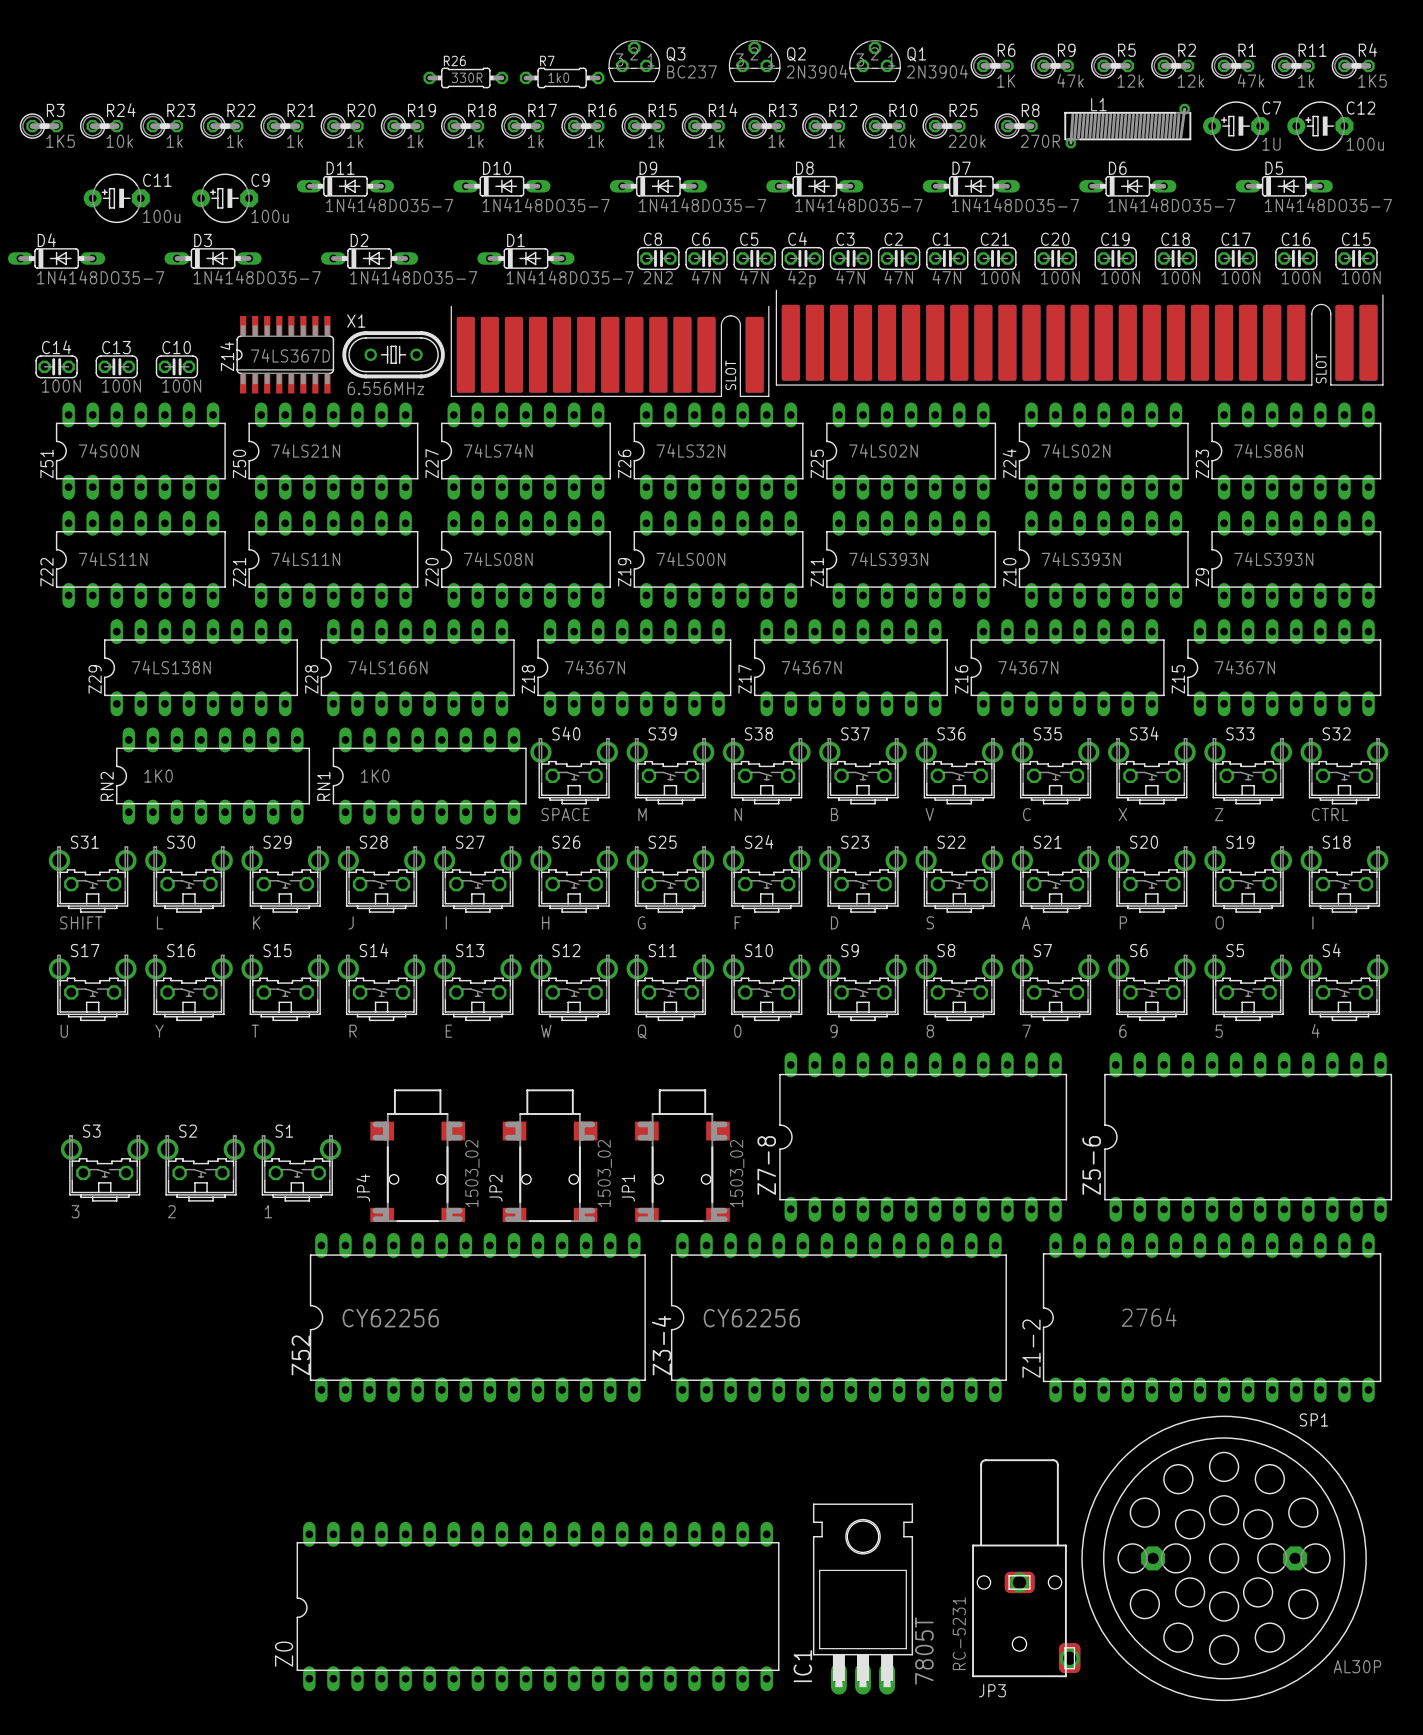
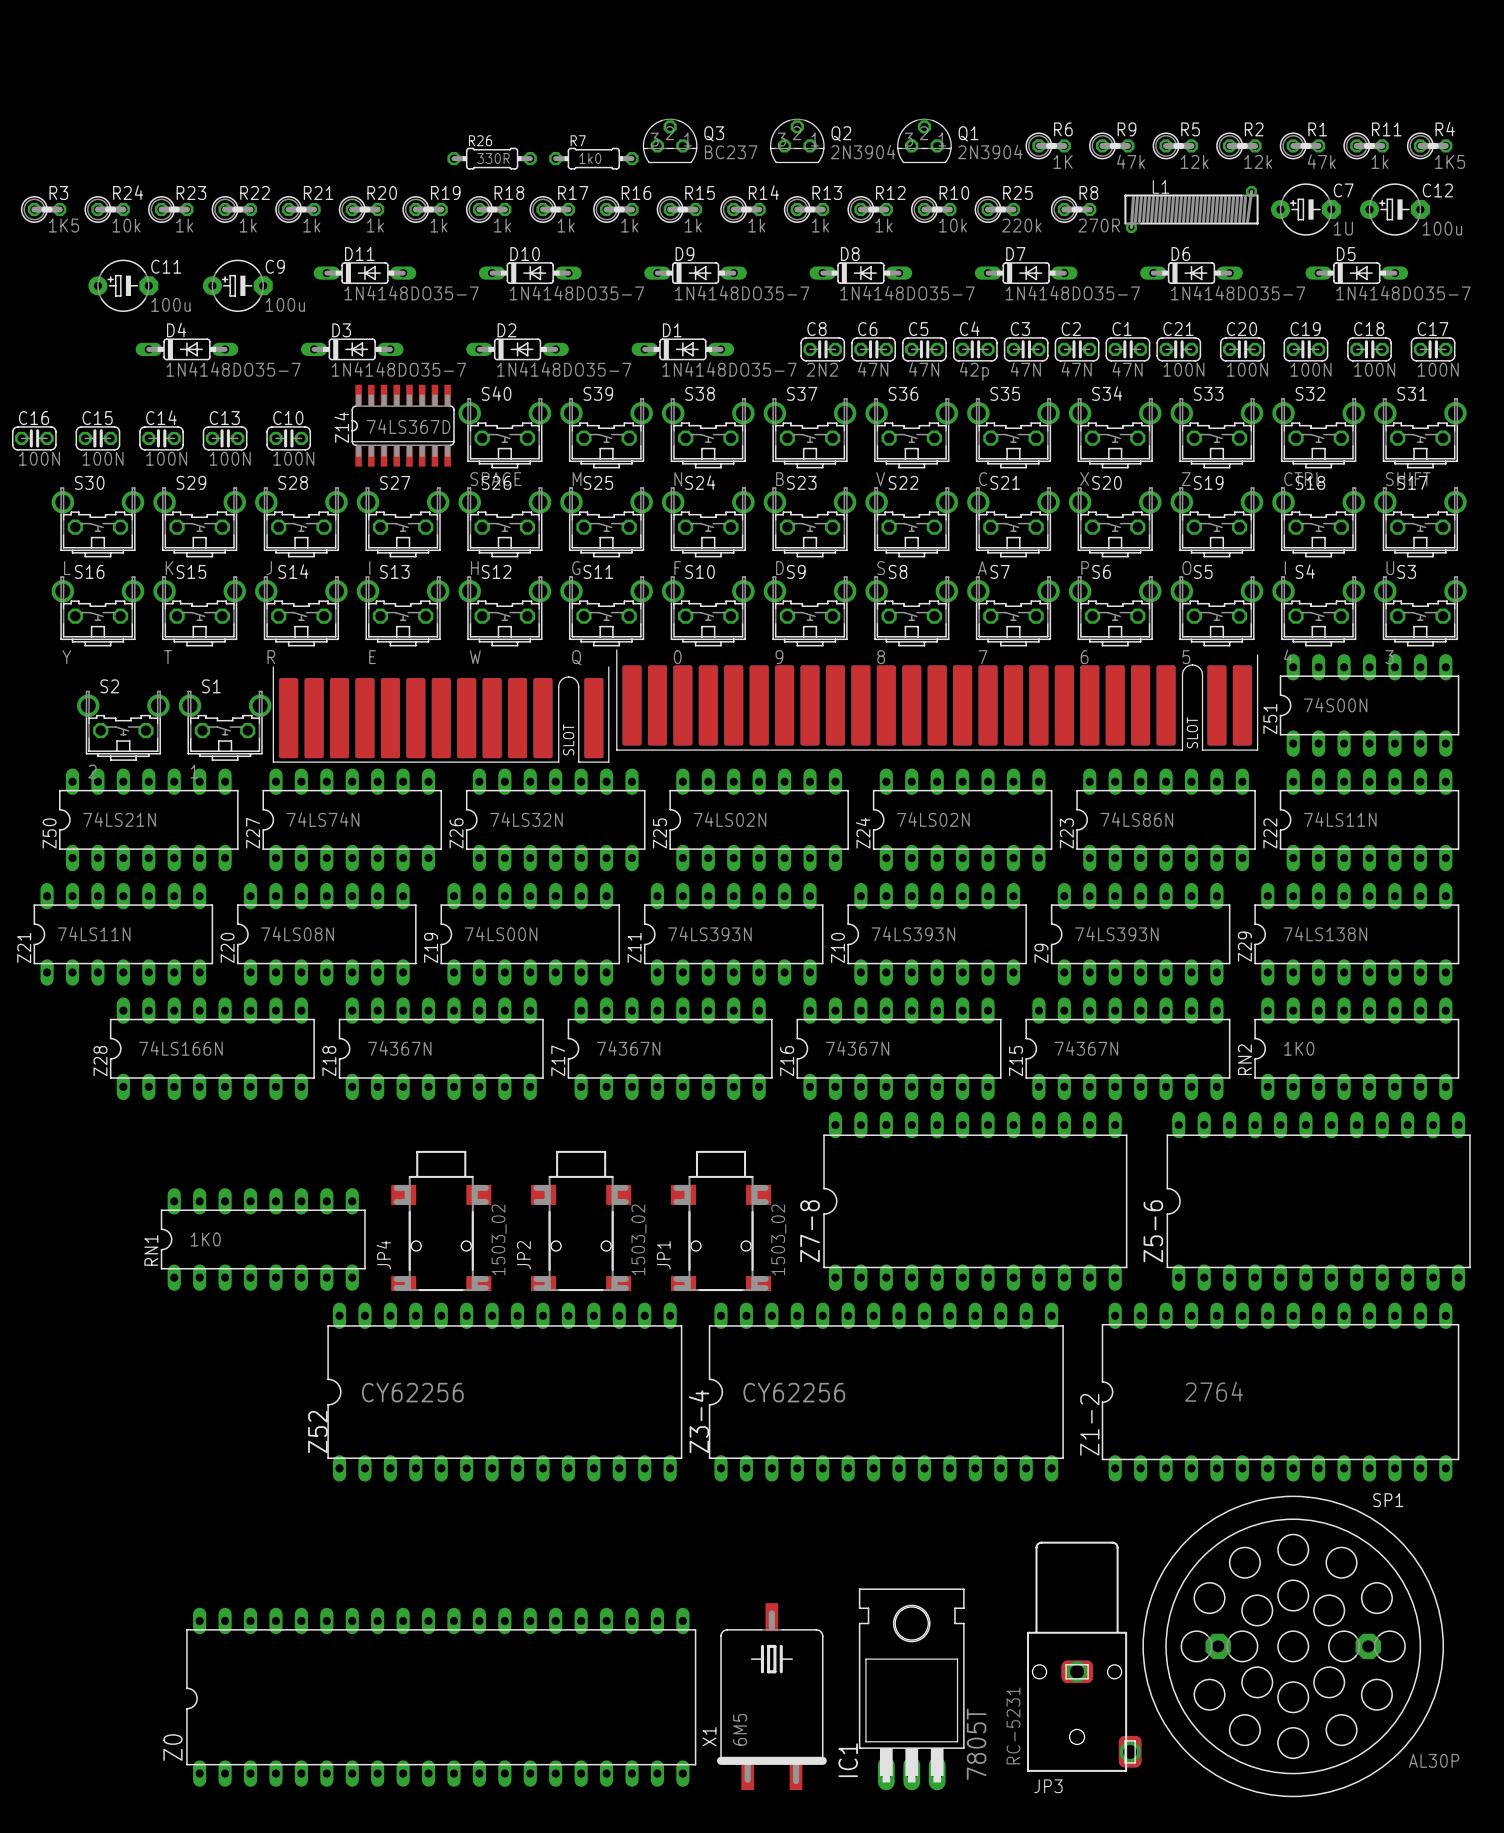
Q3 position: (634, 61) -> (670, 140)
Q2 position: (754, 61) -> (797, 140)
Q1 position: (875, 61) -> (924, 140)
R6 position: (992, 65) -> (1048, 145)
R9 position: (1052, 65) -> (1111, 145)
R5 position: (1112, 65) -> (1175, 145)
R2 position: (1172, 65) -> (1238, 145)
R1 position: (1232, 65) -> (1302, 145)
R11 position: (1293, 65) -> (1366, 145)
R4 position: (1353, 65) -> (1429, 145)
R26 position: (465, 77) -> (492, 158)
R7 position: (562, 77) -> (593, 158)
R3 position: (41, 126) -> (43, 209)
R24 position: (101, 126) -> (107, 209)
R23 position: (161, 126) -> (170, 209)
R22 position: (221, 126) -> (234, 209)
R21 position: (282, 126) -> (297, 209)
R20 position: (342, 126) -> (361, 209)
R19 position: (402, 126) -> (425, 209)
R18 position: (462, 126) -> (488, 209)
R17 position: (522, 126) -> (552, 209)
R16 position: (582, 126) -> (615, 209)
R15 position: (643, 126) -> (679, 209)
R14 position: (703, 126) -> (743, 209)
R13 position: (763, 126) -> (806, 209)
R12 position: (823, 126) -> (870, 209)
R10 position: (883, 126) -> (933, 209)
R25 position: (944, 126) -> (997, 209)
R8 position: (1016, 126) -> (1073, 209)
L1 position: (1127, 126) -> (1191, 209)
C7 position: (1236, 126) -> (1305, 209)
C12 position: (1320, 126) -> (1394, 209)
D11 position: (345, 186) -> (364, 273)
D10 position: (501, 186) -> (530, 273)
D9 position: (658, 186) -> (695, 273)
D8 position: (814, 186) -> (860, 273)
D7 position: (971, 186) -> (1026, 273)
D6 position: (1127, 186) -> (1191, 273)
D5 position: (1284, 186) -> (1356, 273)
C11 position: (116, 198) -> (123, 285)
C9 position: (225, 198) -> (237, 285)
D4 position: (56, 258) -> (186, 349)
D3 position: (213, 258) -> (352, 349)
D2 position: (369, 258) -> (517, 349)
D1 position: (525, 258) -> (682, 349)
C8 position: (658, 258) -> (822, 349)
C6 position: (706, 258) -> (873, 349)
C5 position: (754, 258) -> (924, 349)
C4 position: (802, 258) -> (975, 349)
C3 position: (850, 258) -> (1026, 349)
C2 position: (899, 258) -> (1077, 349)
C1 position: (947, 258) -> (1127, 349)
C21 position: (995, 258) -> (1178, 349)
C20 position: (1055, 258) -> (1242, 349)
C19 position: (1115, 258) -> (1305, 349)
C18 position: (1175, 258) -> (1369, 349)
C17 position: (1236, 258) -> (1433, 349)
C16 position: (1296, 258) -> (34, 438)
C15 position: (1356, 258) -> (97, 438)
X1 name position: X1 (356, 321) -> X1 (709, 1736)
X1 footprint: [342, 331, 445, 379] -> [716, 1603, 827, 1791]
part: (1079, 337) -> none
part: (610, 351) -> none
Z14 position: (285, 354) -> (403, 425)
C14 position: (56, 366) -> (161, 438)
C13 position: (116, 366) -> (225, 438)
C10 position: (176, 366) -> (288, 438)
X1 value: 6.556MHz (385, 388) -> 6M5 (740, 1729)
Z51 position: (140, 451) -> (1369, 705)
Z50 position: (333, 451) -> (148, 819)
Z27 position: (525, 451) -> (352, 819)
Z26 position: (718, 451) -> (555, 819)
Z25 position: (911, 451) -> (759, 819)
Z24 position: (1103, 451) -> (962, 819)
Z23 position: (1296, 451) -> (1166, 819)
Z22 position: (140, 559) -> (1369, 819)
Z21 position: (333, 559) -> (123, 934)
Z20 position: (525, 559) -> (326, 934)
Z19 position: (718, 559) -> (530, 934)
Z11 position: (911, 559) -> (733, 934)
Z10 position: (1103, 559) -> (937, 934)
Z9 position: (1296, 559) -> (1140, 934)
part: none -> (937, 700)
Z29 position: (201, 667) -> (1356, 934)
Z28 position: (417, 667) -> (212, 1048)
Z18 position: (634, 667) -> (441, 1048)
Z17 position: (850, 667) -> (670, 1048)
Z16 position: (1067, 667) -> (899, 1048)
Z15 position: (1284, 667) -> (1127, 1048)
part: none -> (441, 714)
S40 position: (574, 771) -> (504, 433)
S39 position: (670, 771) -> (606, 433)
S38 position: (766, 771) -> (708, 433)
S37 position: (863, 771) -> (810, 433)
S36 position: (959, 771) -> (911, 433)
S35 position: (1055, 771) -> (1013, 433)
S34 position: (1151, 771) -> (1115, 433)
S33 position: (1248, 771) -> (1216, 433)
S32 position: (1344, 771) -> (1318, 433)
RN2 position: (213, 776) -> (1356, 1048)
RN1 position: (429, 776) -> (263, 1239)
S31 position: (92, 879) -> (1420, 433)
S30 position: (188, 879) -> (97, 522)
S29 position: (285, 879) -> (199, 522)
S28 position: (381, 879) -> (301, 522)
S27 position: (477, 879) -> (403, 522)
S26 position: (574, 879) -> (504, 522)
S25 position: (670, 879) -> (606, 522)
S24 position: (766, 879) -> (708, 522)
S23 position: (863, 879) -> (810, 522)
S22 position: (959, 879) -> (911, 522)
S21 position: (1055, 879) -> (1013, 522)
S20 position: (1151, 879) -> (1115, 522)
S19 position: (1248, 879) -> (1216, 522)
S18 position: (1344, 879) -> (1318, 522)
S17 position: (92, 987) -> (1420, 522)
S16 position: (188, 987) -> (97, 611)
S15 position: (285, 987) -> (199, 611)
S14 position: (381, 987) -> (301, 611)
S13 position: (477, 987) -> (403, 611)
S12 position: (574, 987) -> (504, 611)
S11 position: (670, 987) -> (606, 611)
S10 position: (766, 987) -> (708, 611)
S9 position: (863, 987) -> (810, 611)
S8 position: (959, 987) -> (911, 611)
S7 position: (1055, 987) -> (1013, 611)
S6 position: (1151, 987) -> (1115, 611)
S5 position: (1248, 987) -> (1216, 611)
S4 position: (1344, 987) -> (1318, 611)
S3 position: (104, 1168) -> (1420, 611)
S2 position: (201, 1168) -> (123, 725)
S1 position: (297, 1168) -> (225, 725)
Z0 position: (538, 1606) -> (441, 1697)

